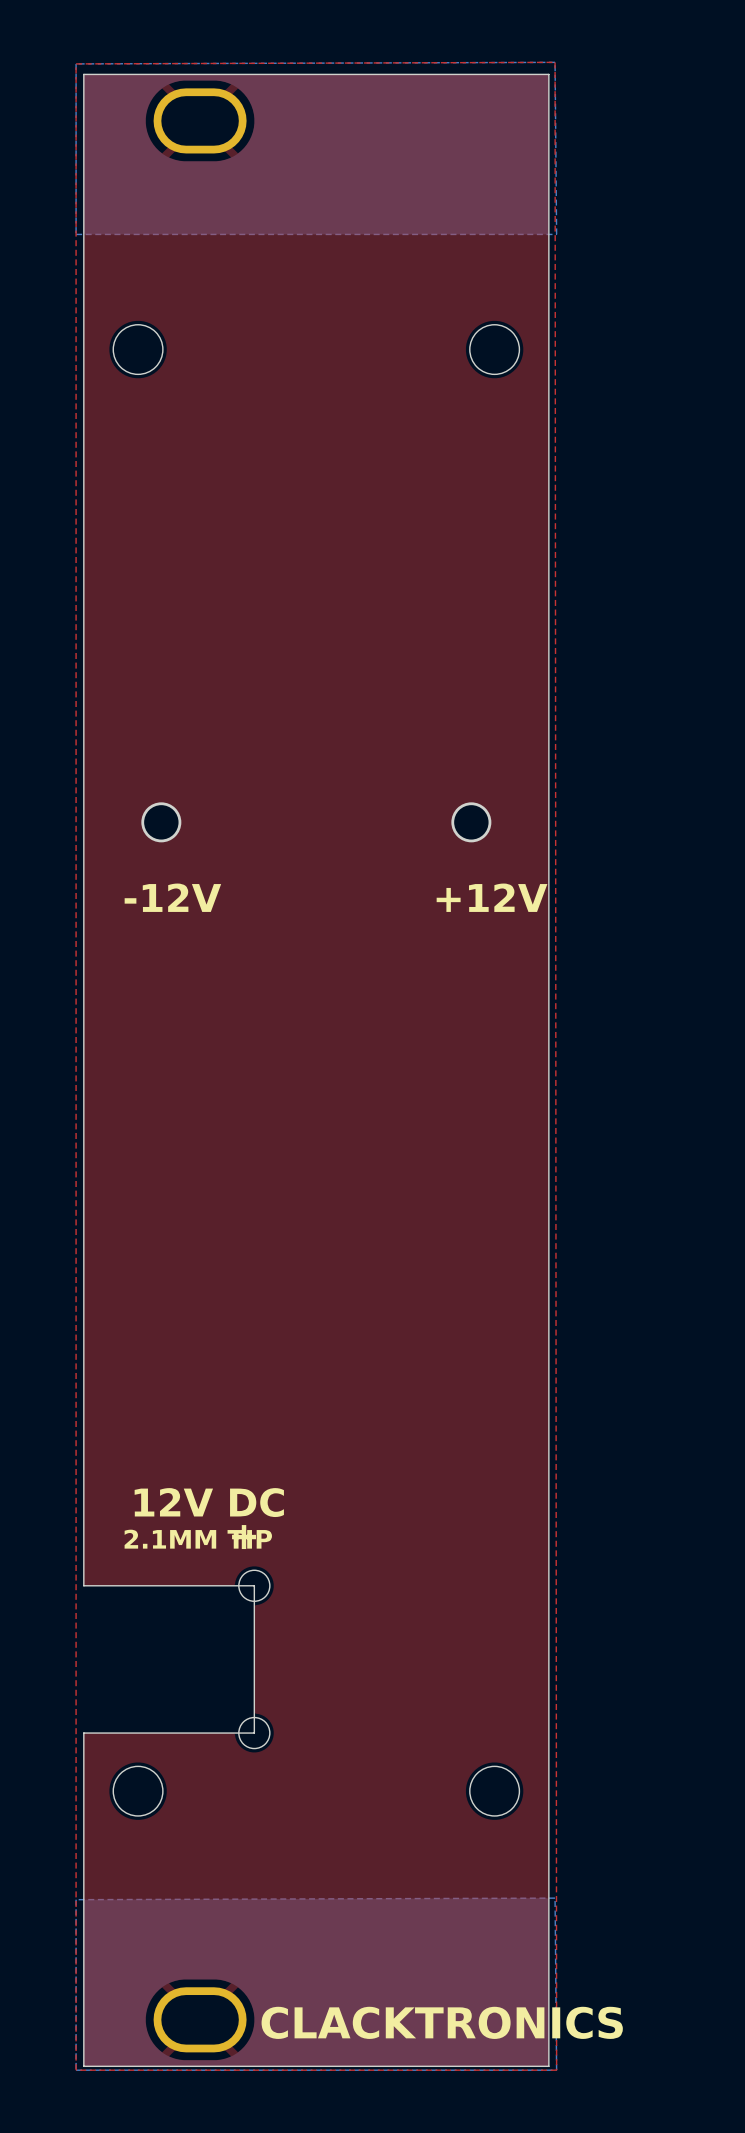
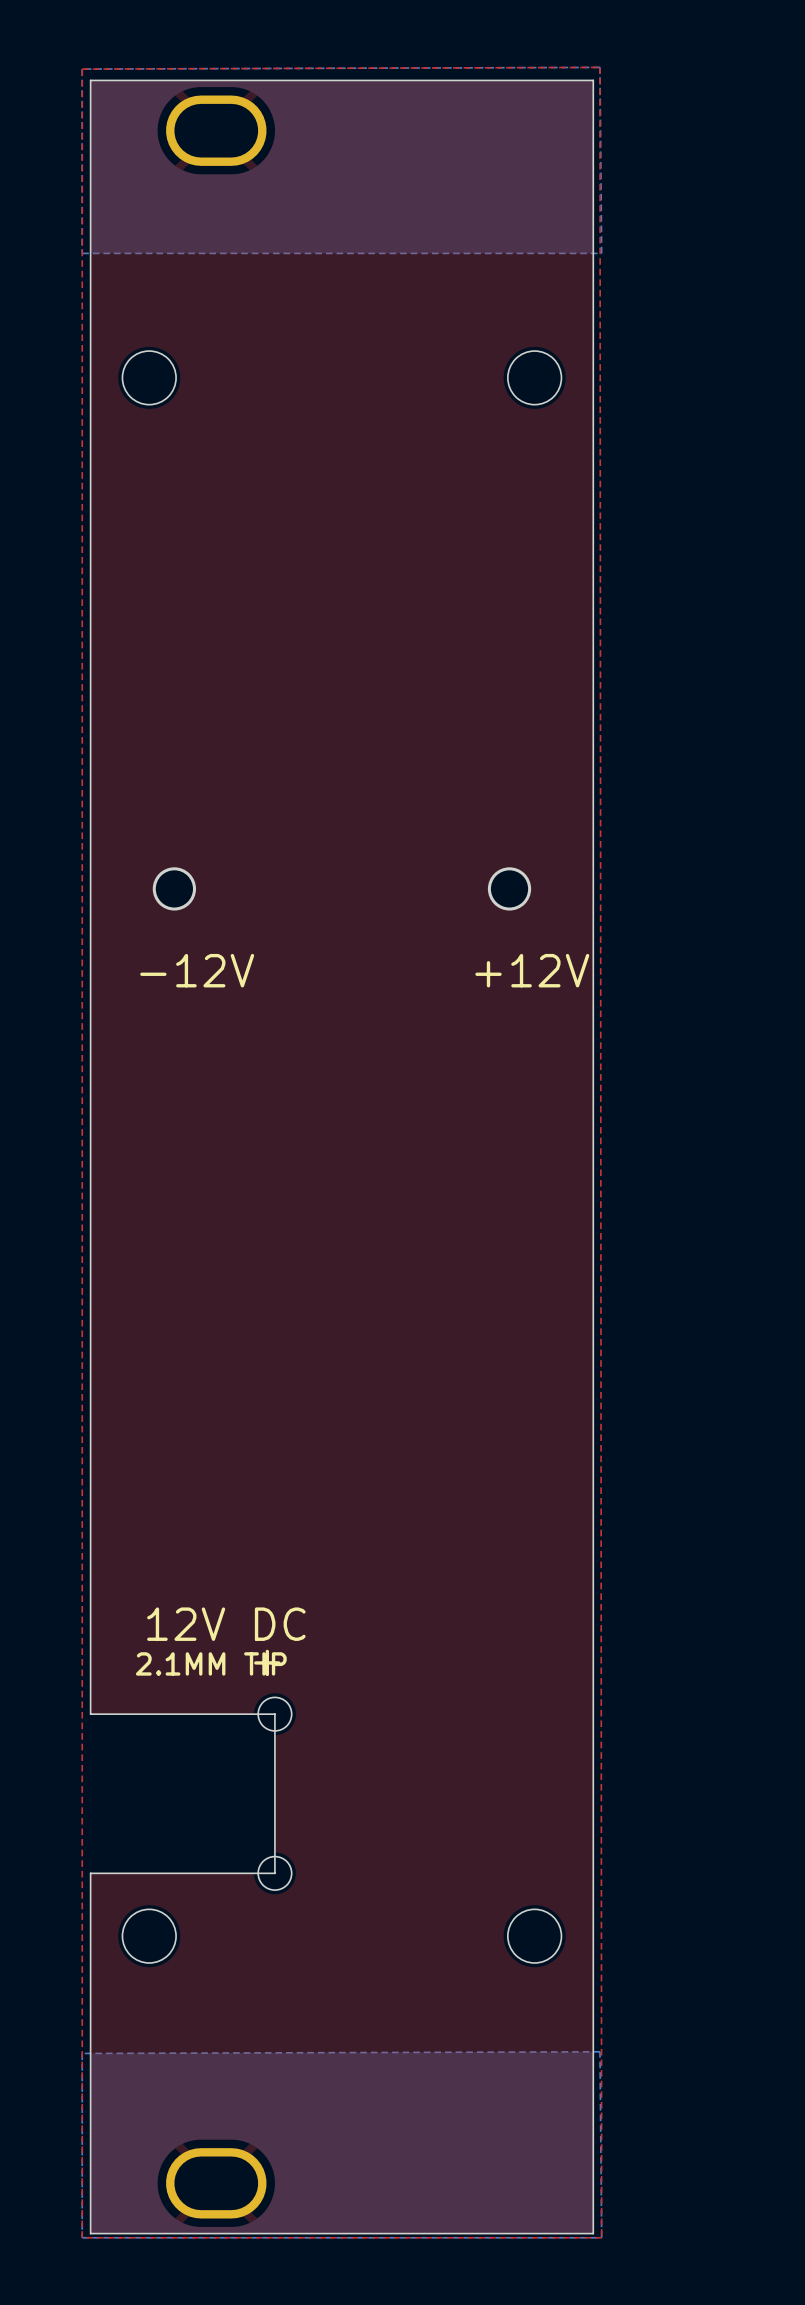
text: CLACKTRONICS (442, 2022) -> none

